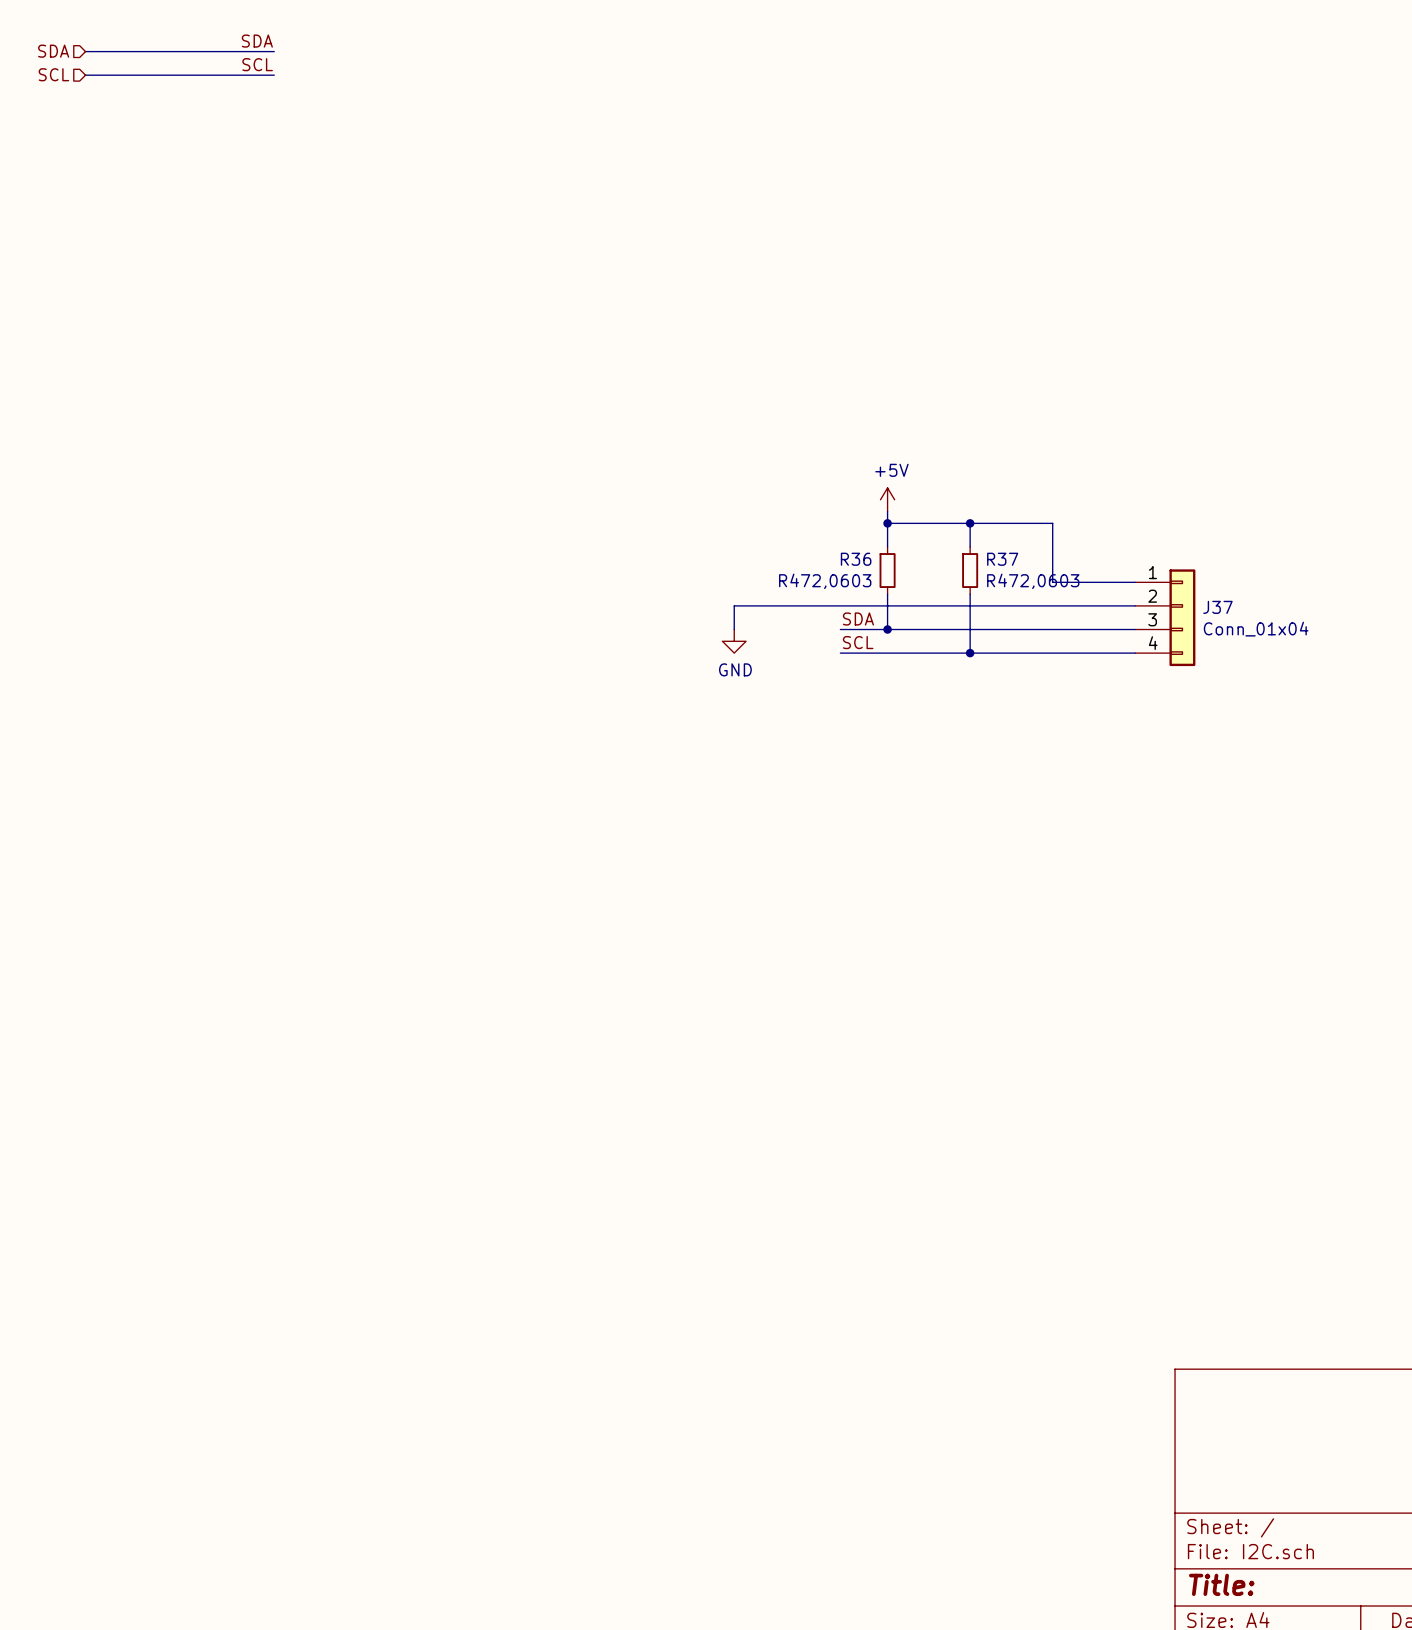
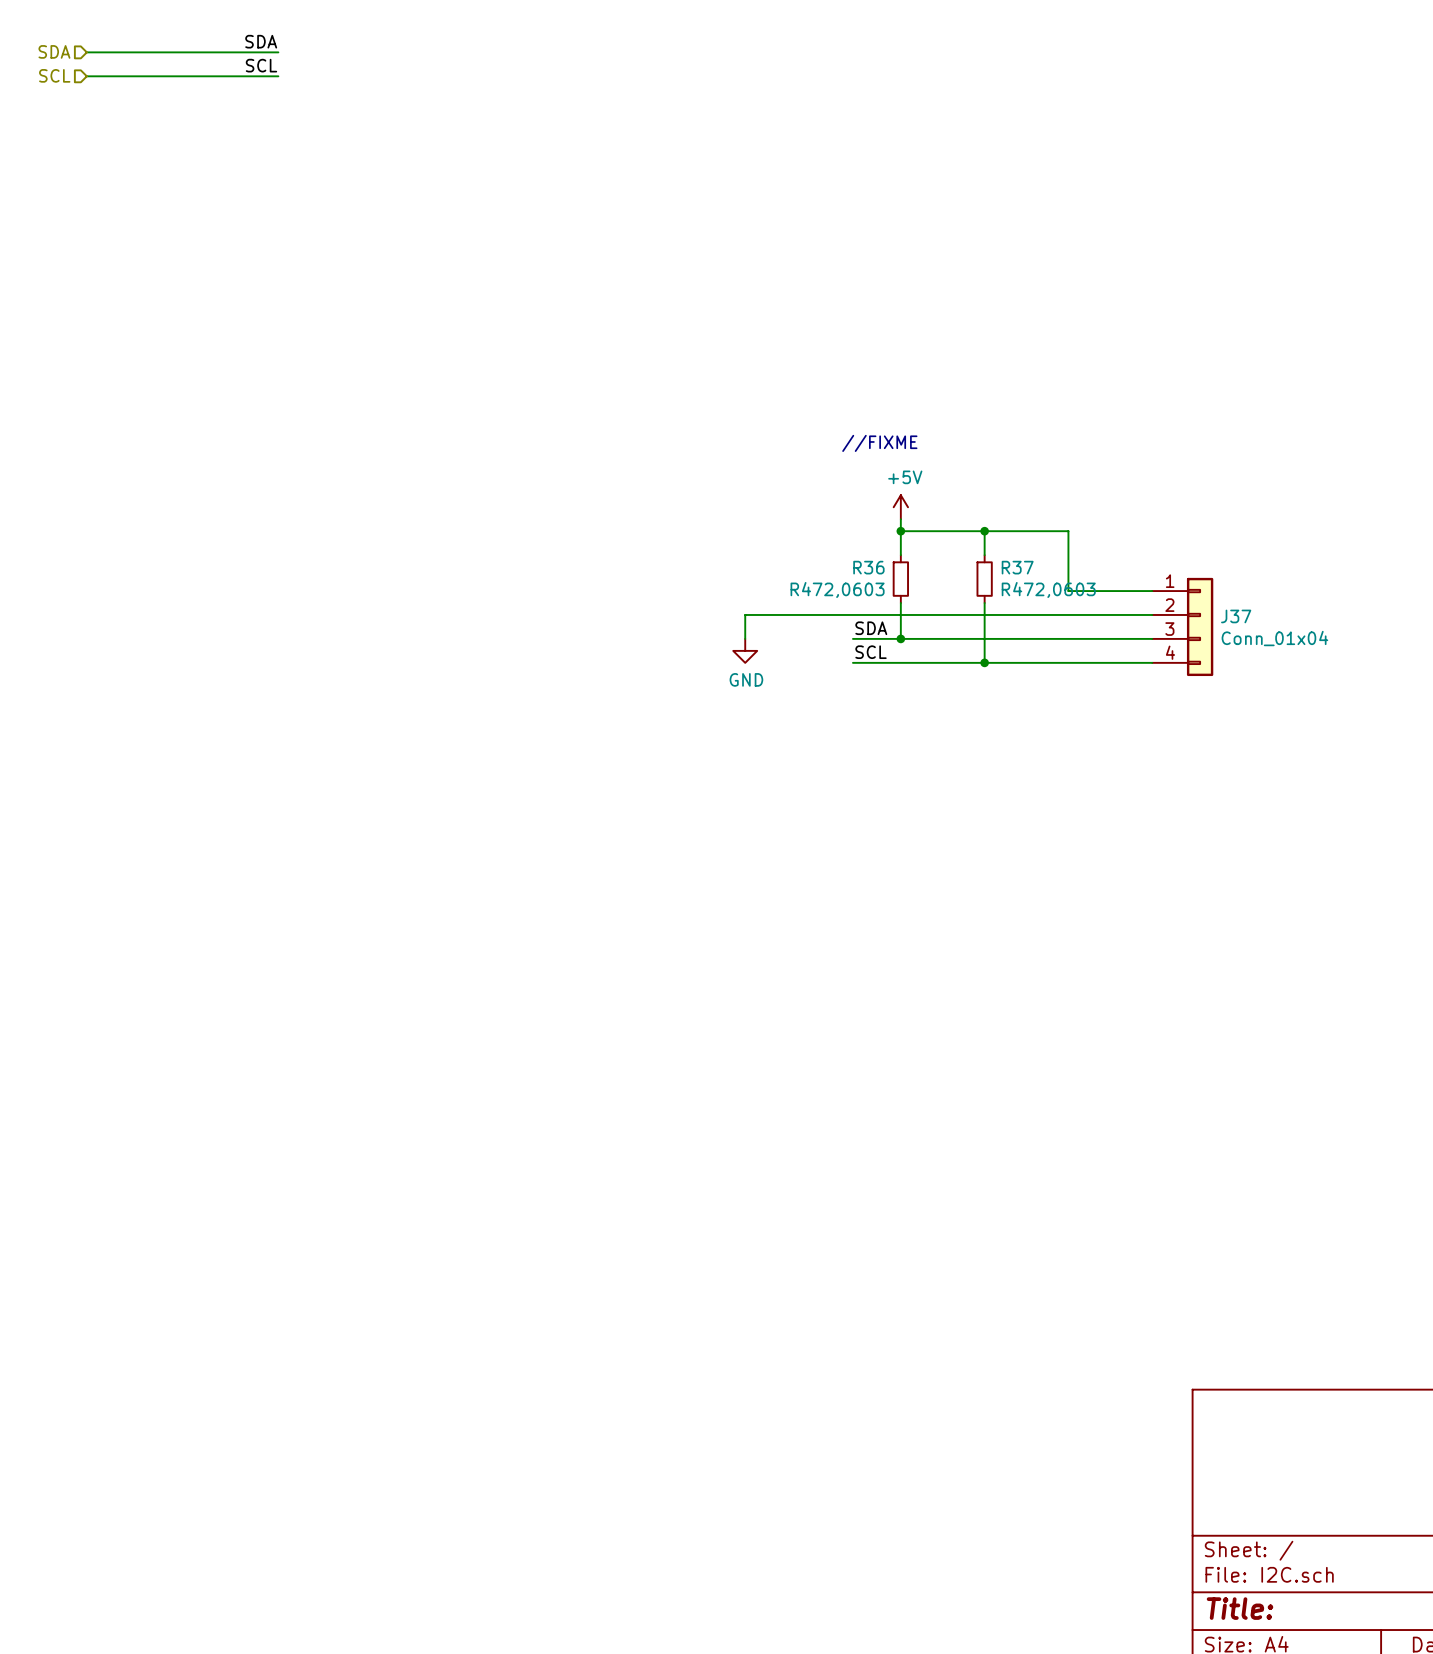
text: none -> //FIXME (879, 443)

